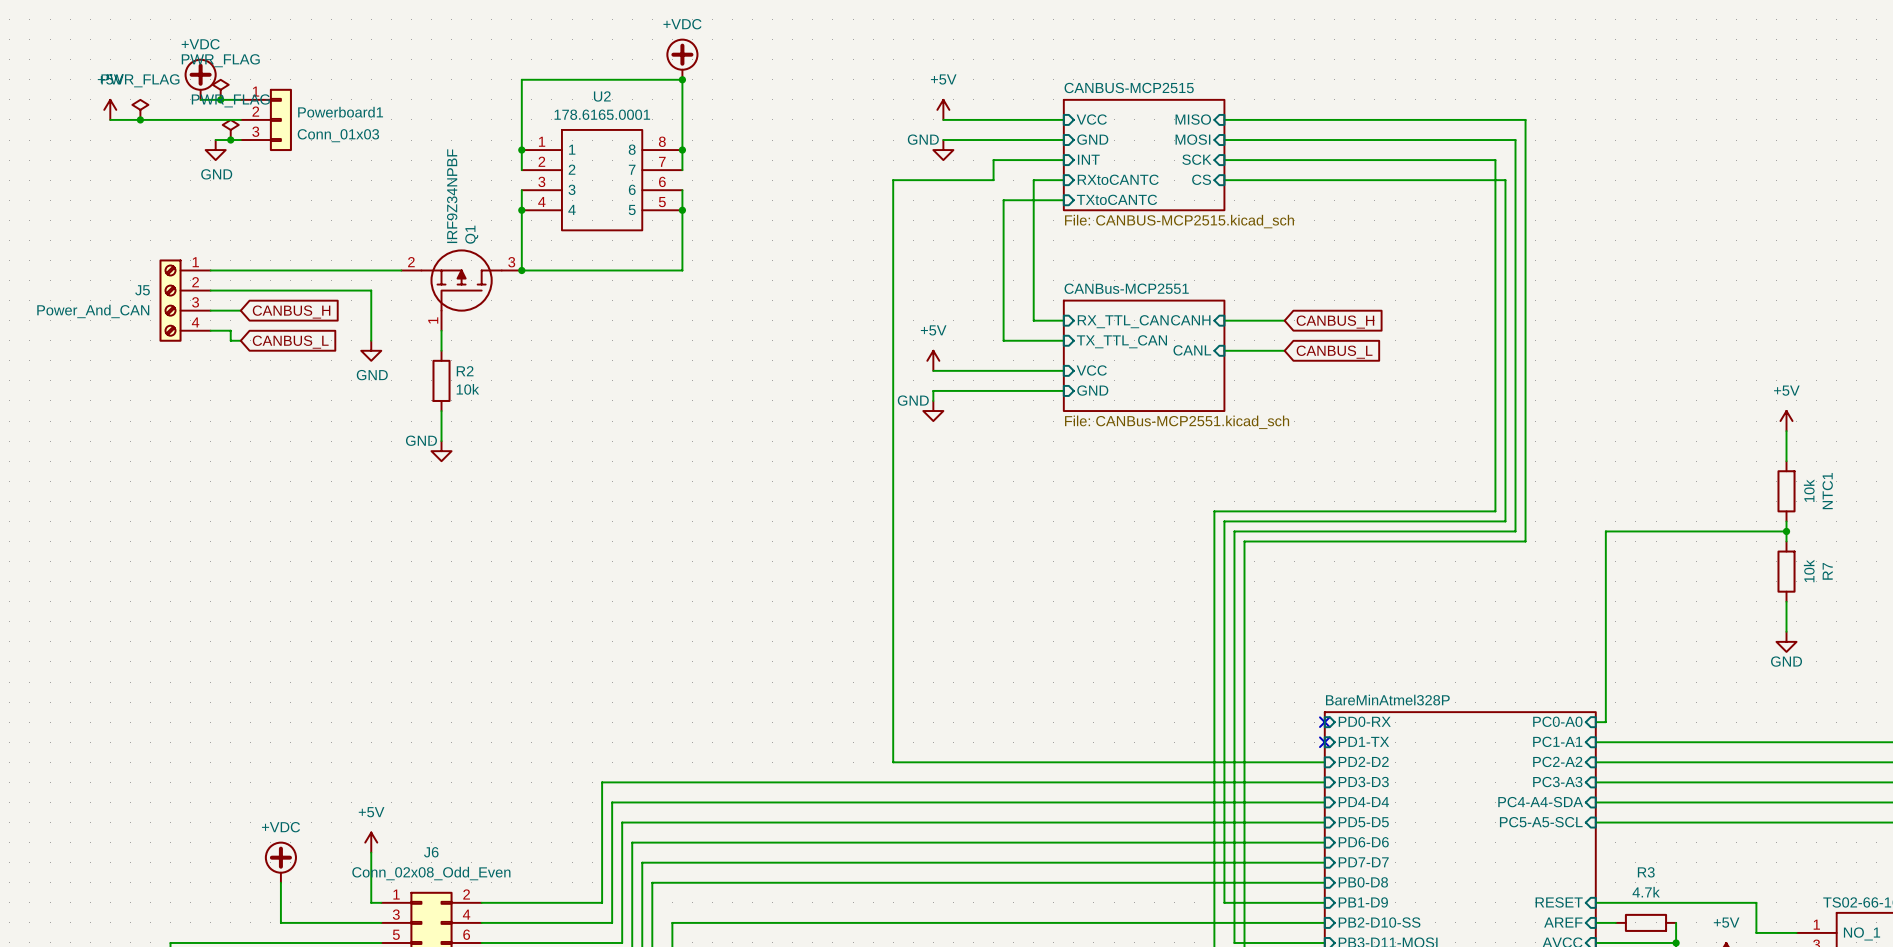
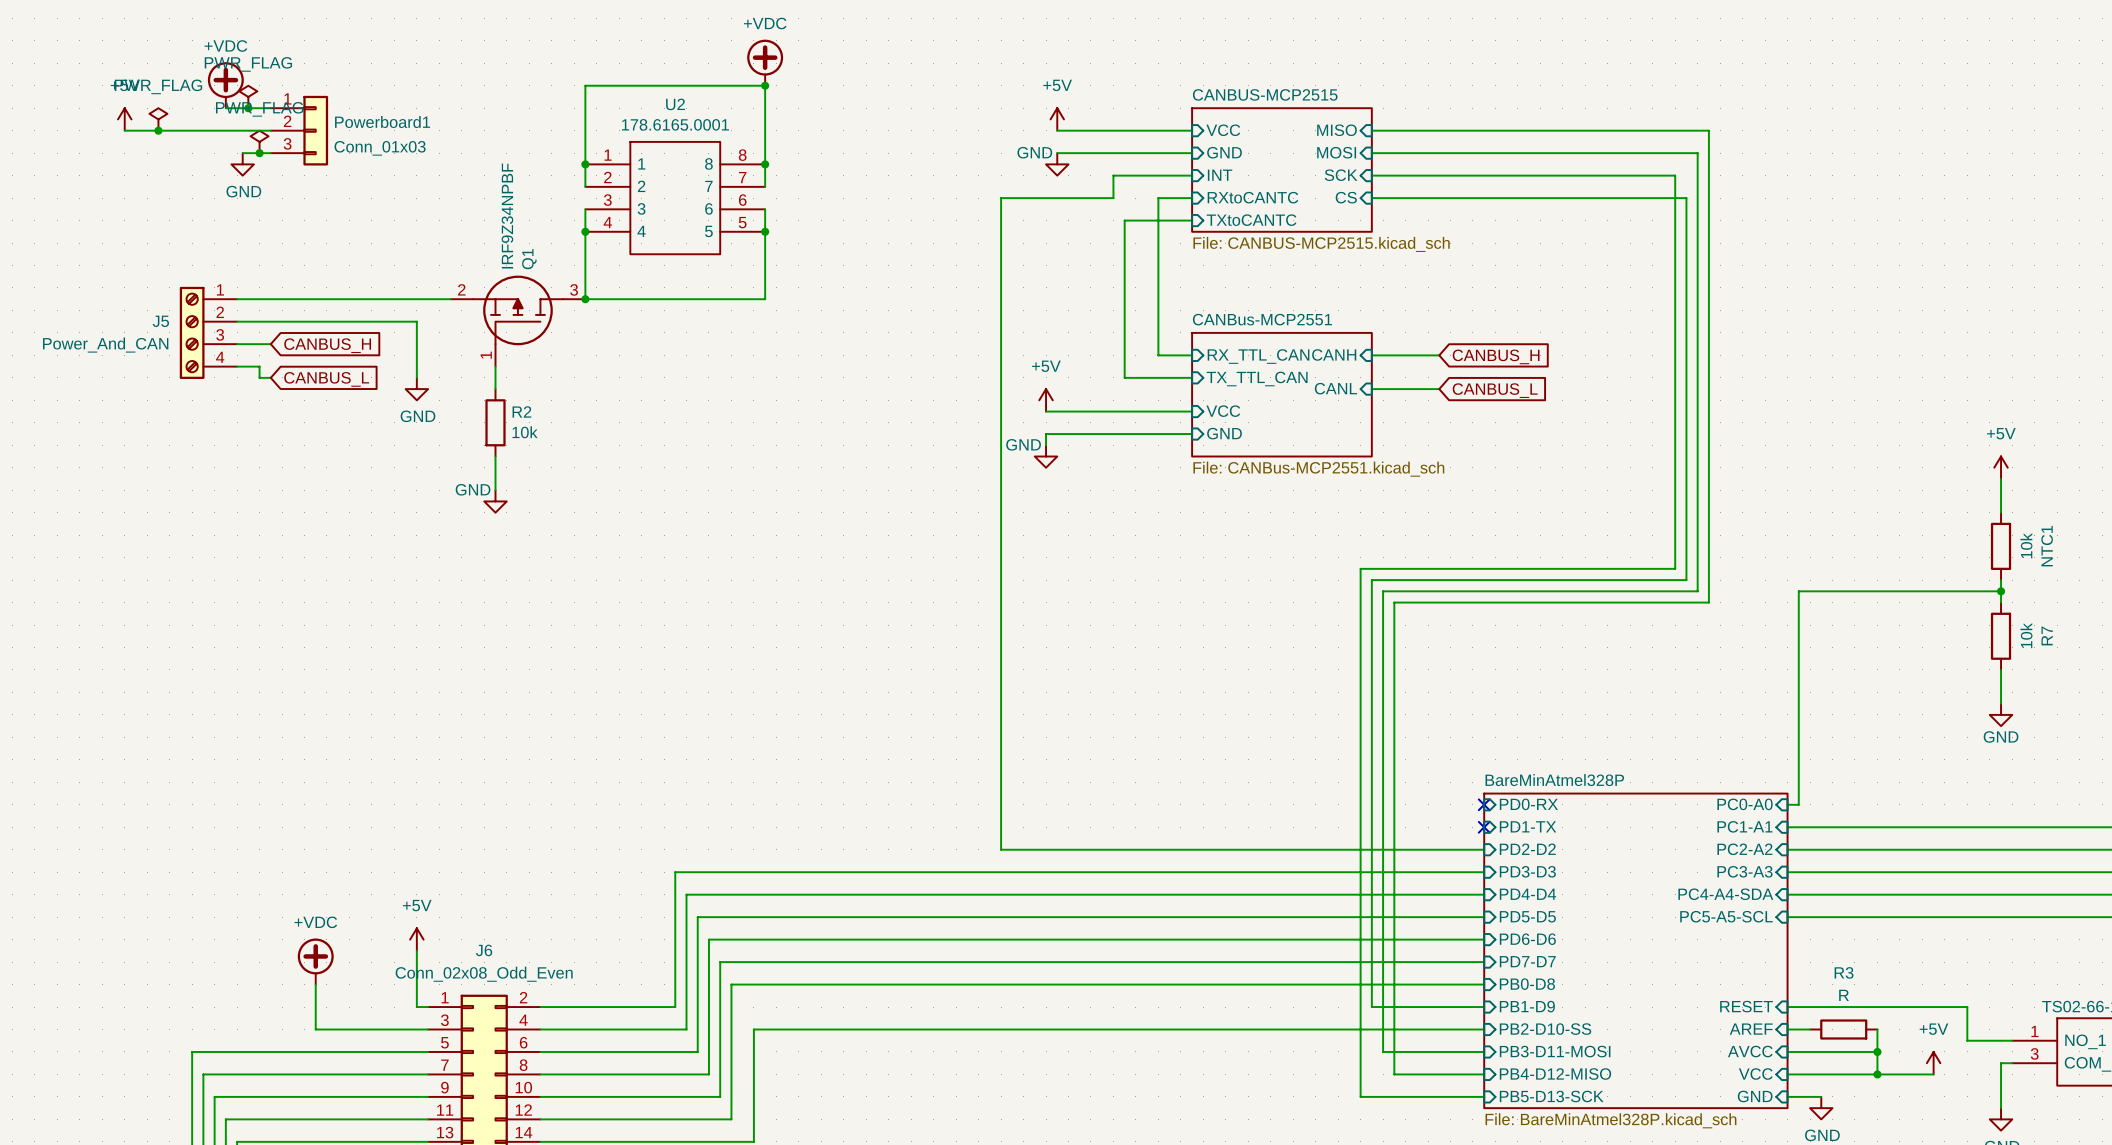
R3 value: 4.7k (1646, 892) -> R (1844, 995)

